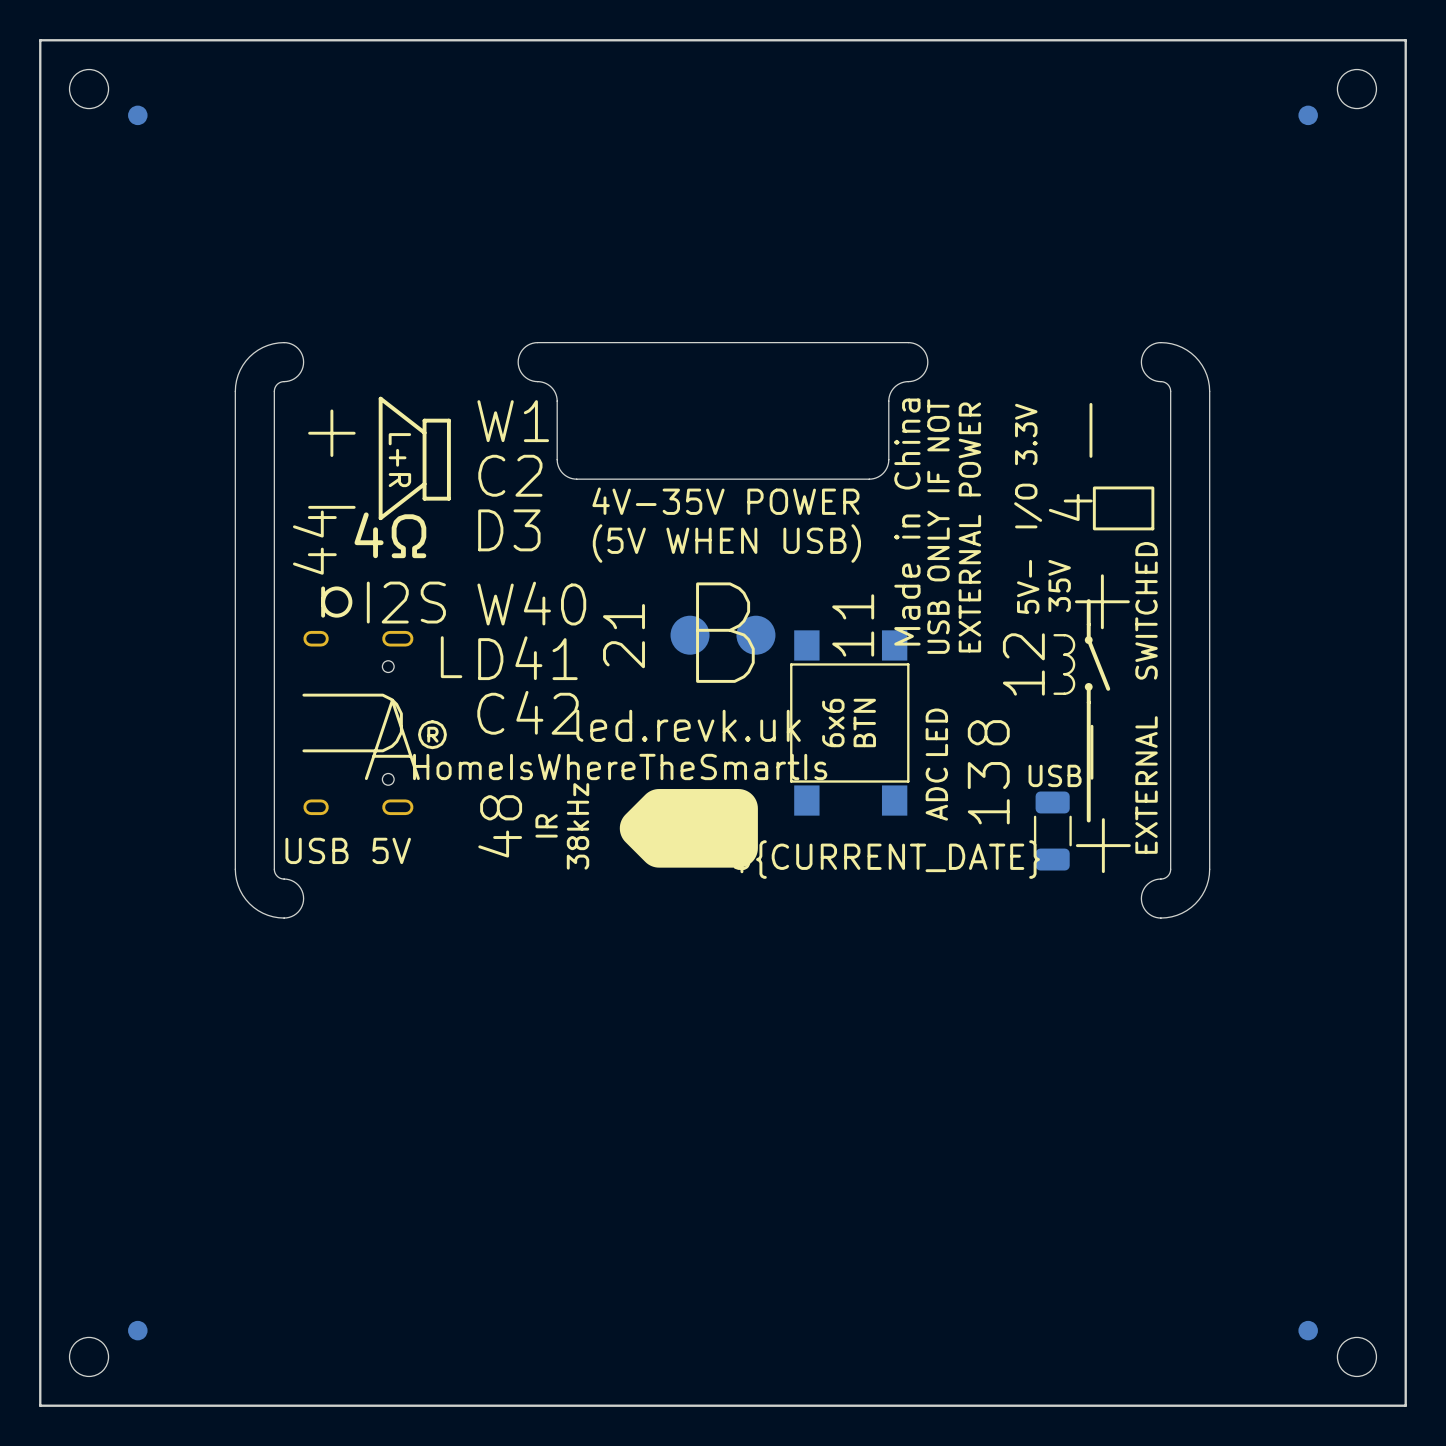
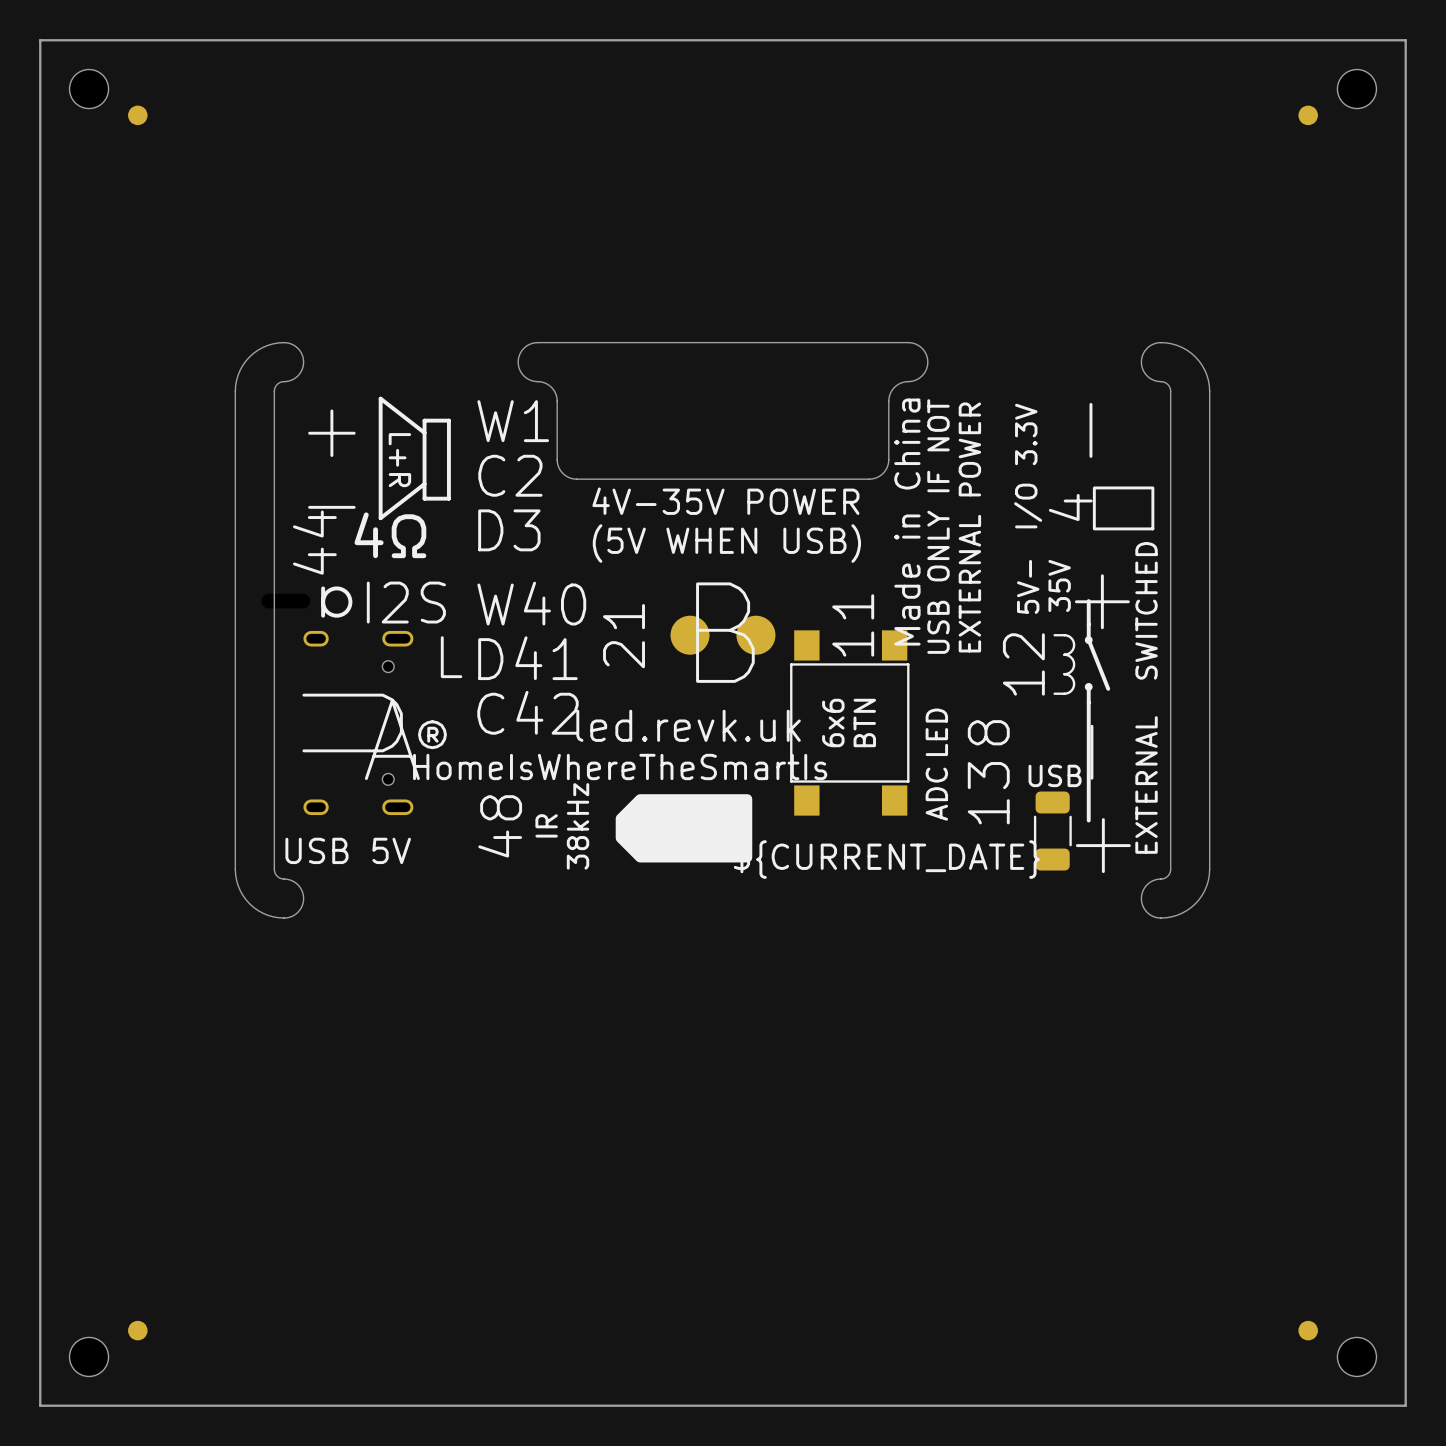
part footprint: [619, 789, 758, 868] -> [615, 794, 753, 863]

